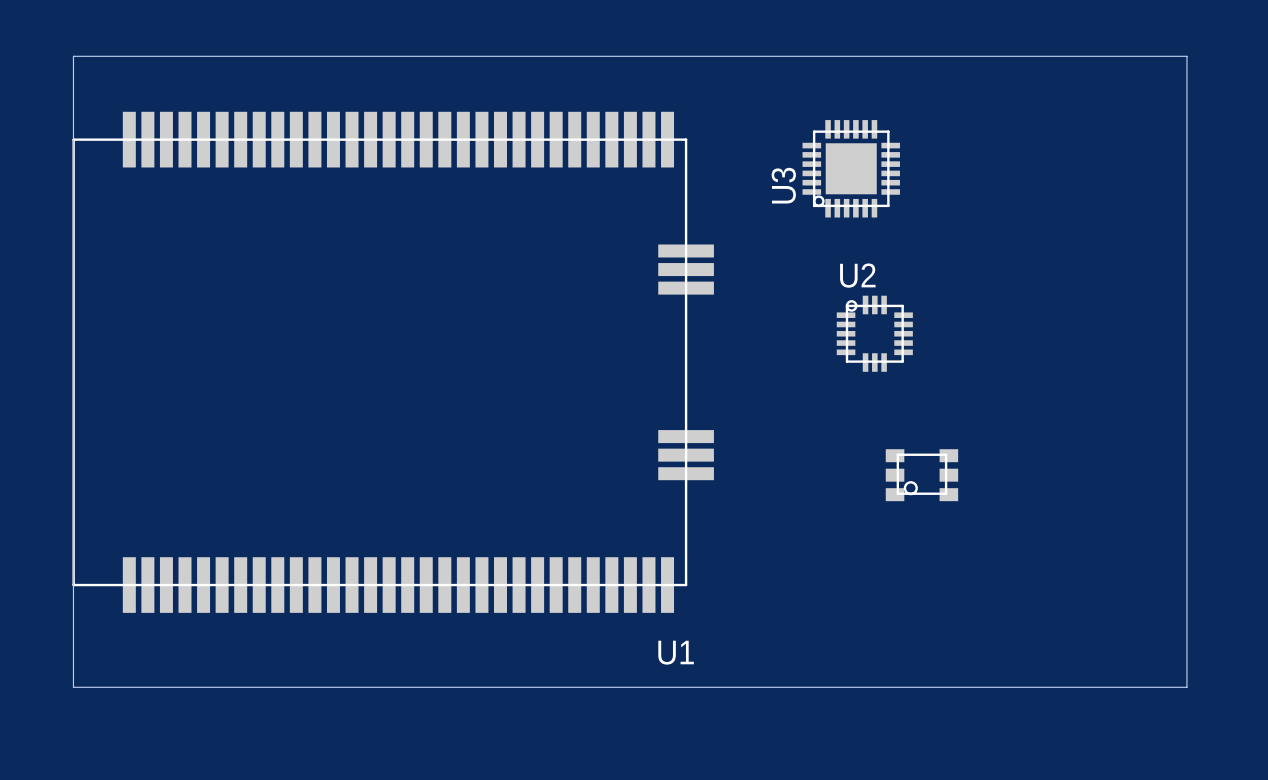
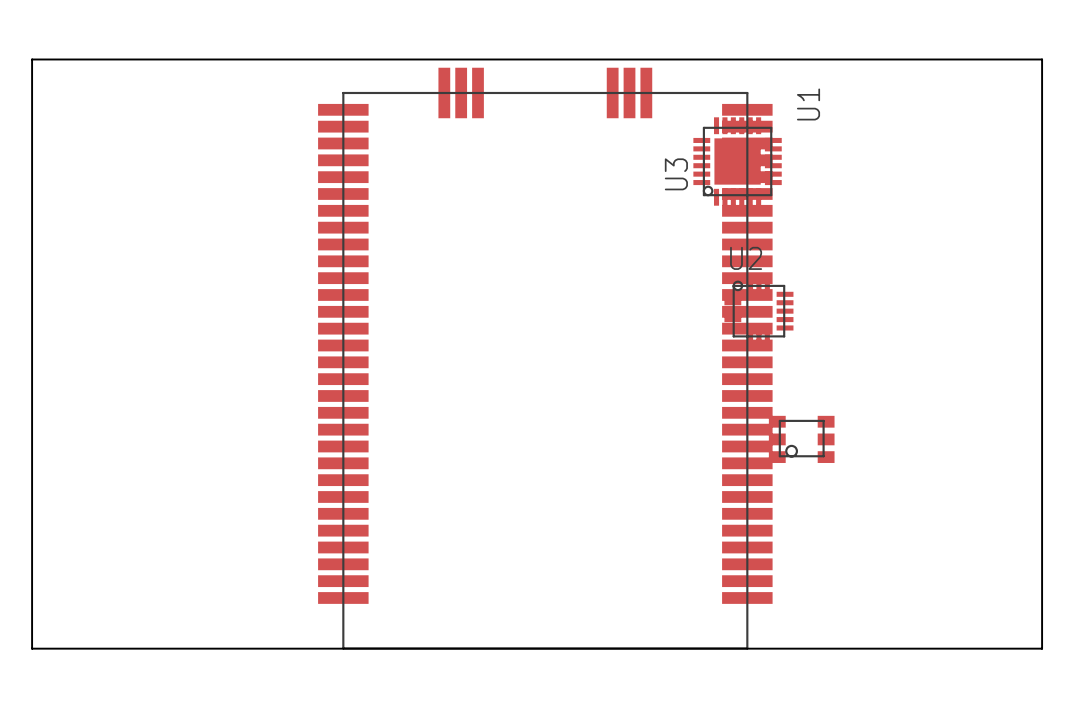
U1 rotation: 0° (393, 362) -> 90° counterclockwise (545, 358)
board edge: (73, 687) (1186, 687) -> (32, 631) (32, 648) (1042, 648) (1042, 631)

